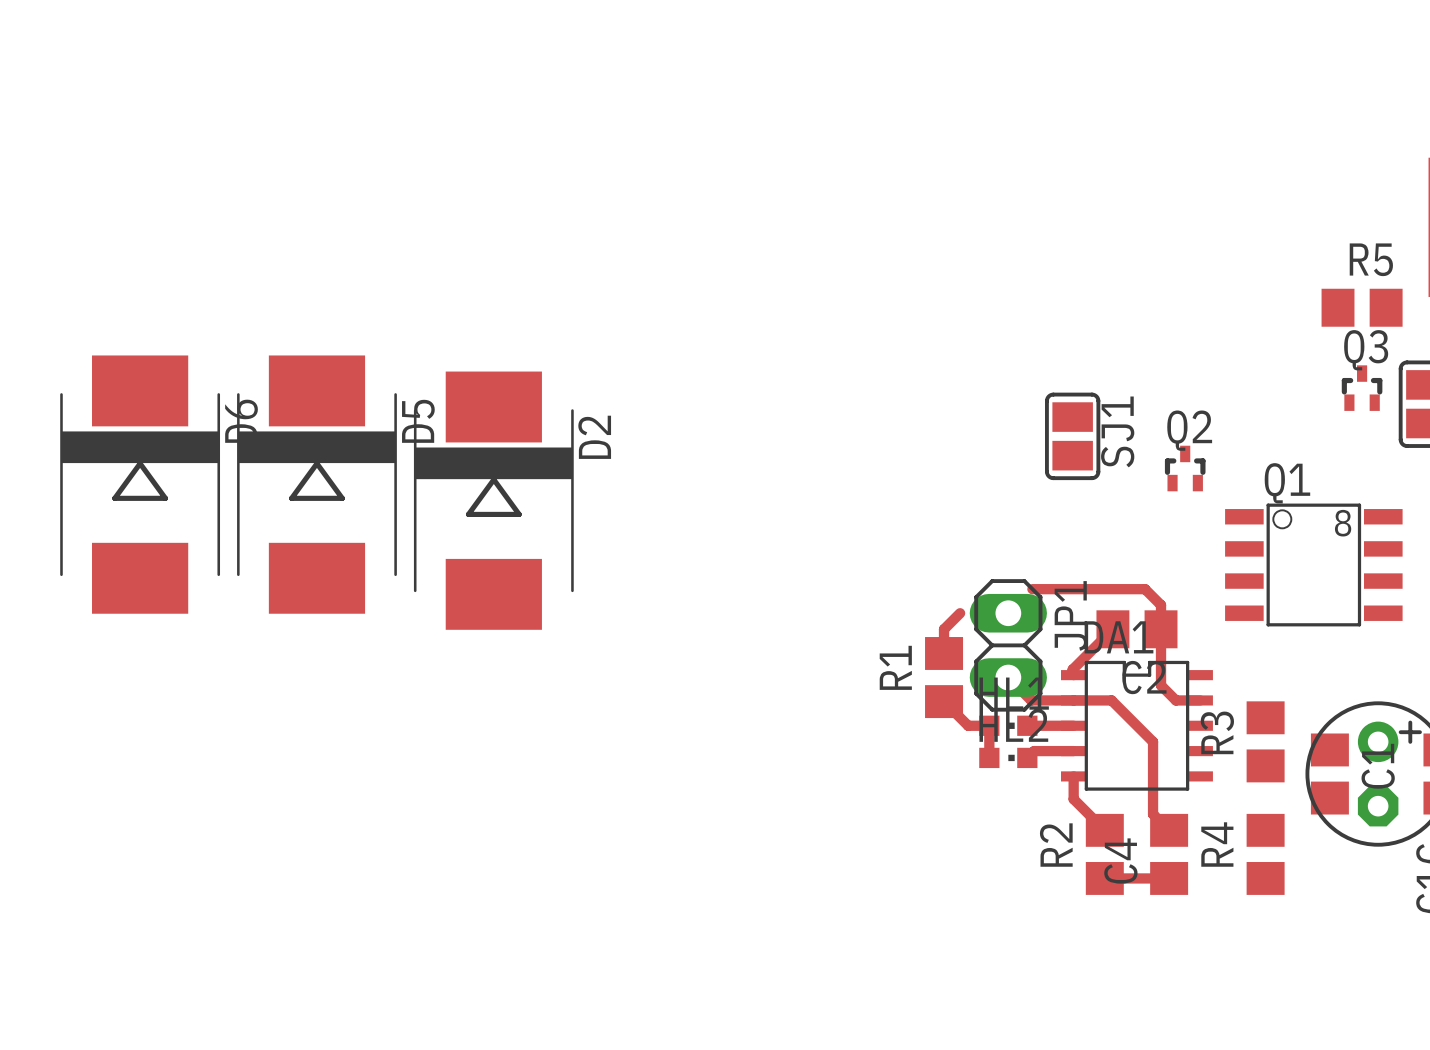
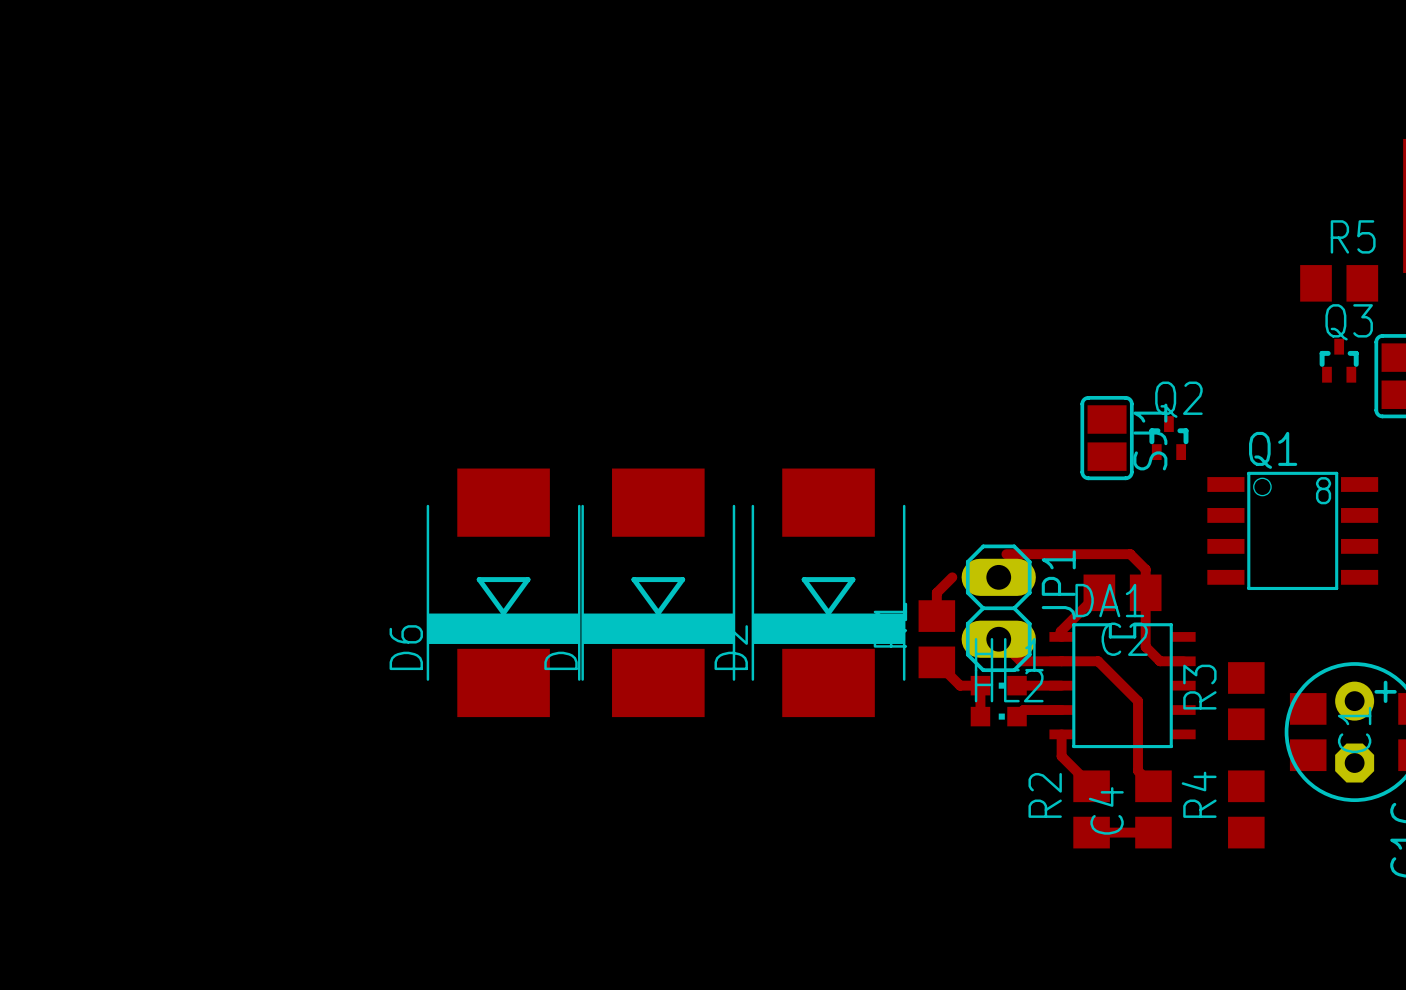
SJ1 position: (1072, 436) -> (1107, 438)
D6 rotation: 0° (140, 484) -> 180° (503, 592)
D6 position: (140, 484) -> (503, 592)
D5 rotation: 0° (316, 484) -> 180° (658, 592)
D5 position: (316, 484) -> (658, 592)
D2 rotation: 0° (493, 500) -> 180° (828, 592)
D2 position: (493, 500) -> (828, 592)
top track: none -> (1006, 554) (1021, 554)

